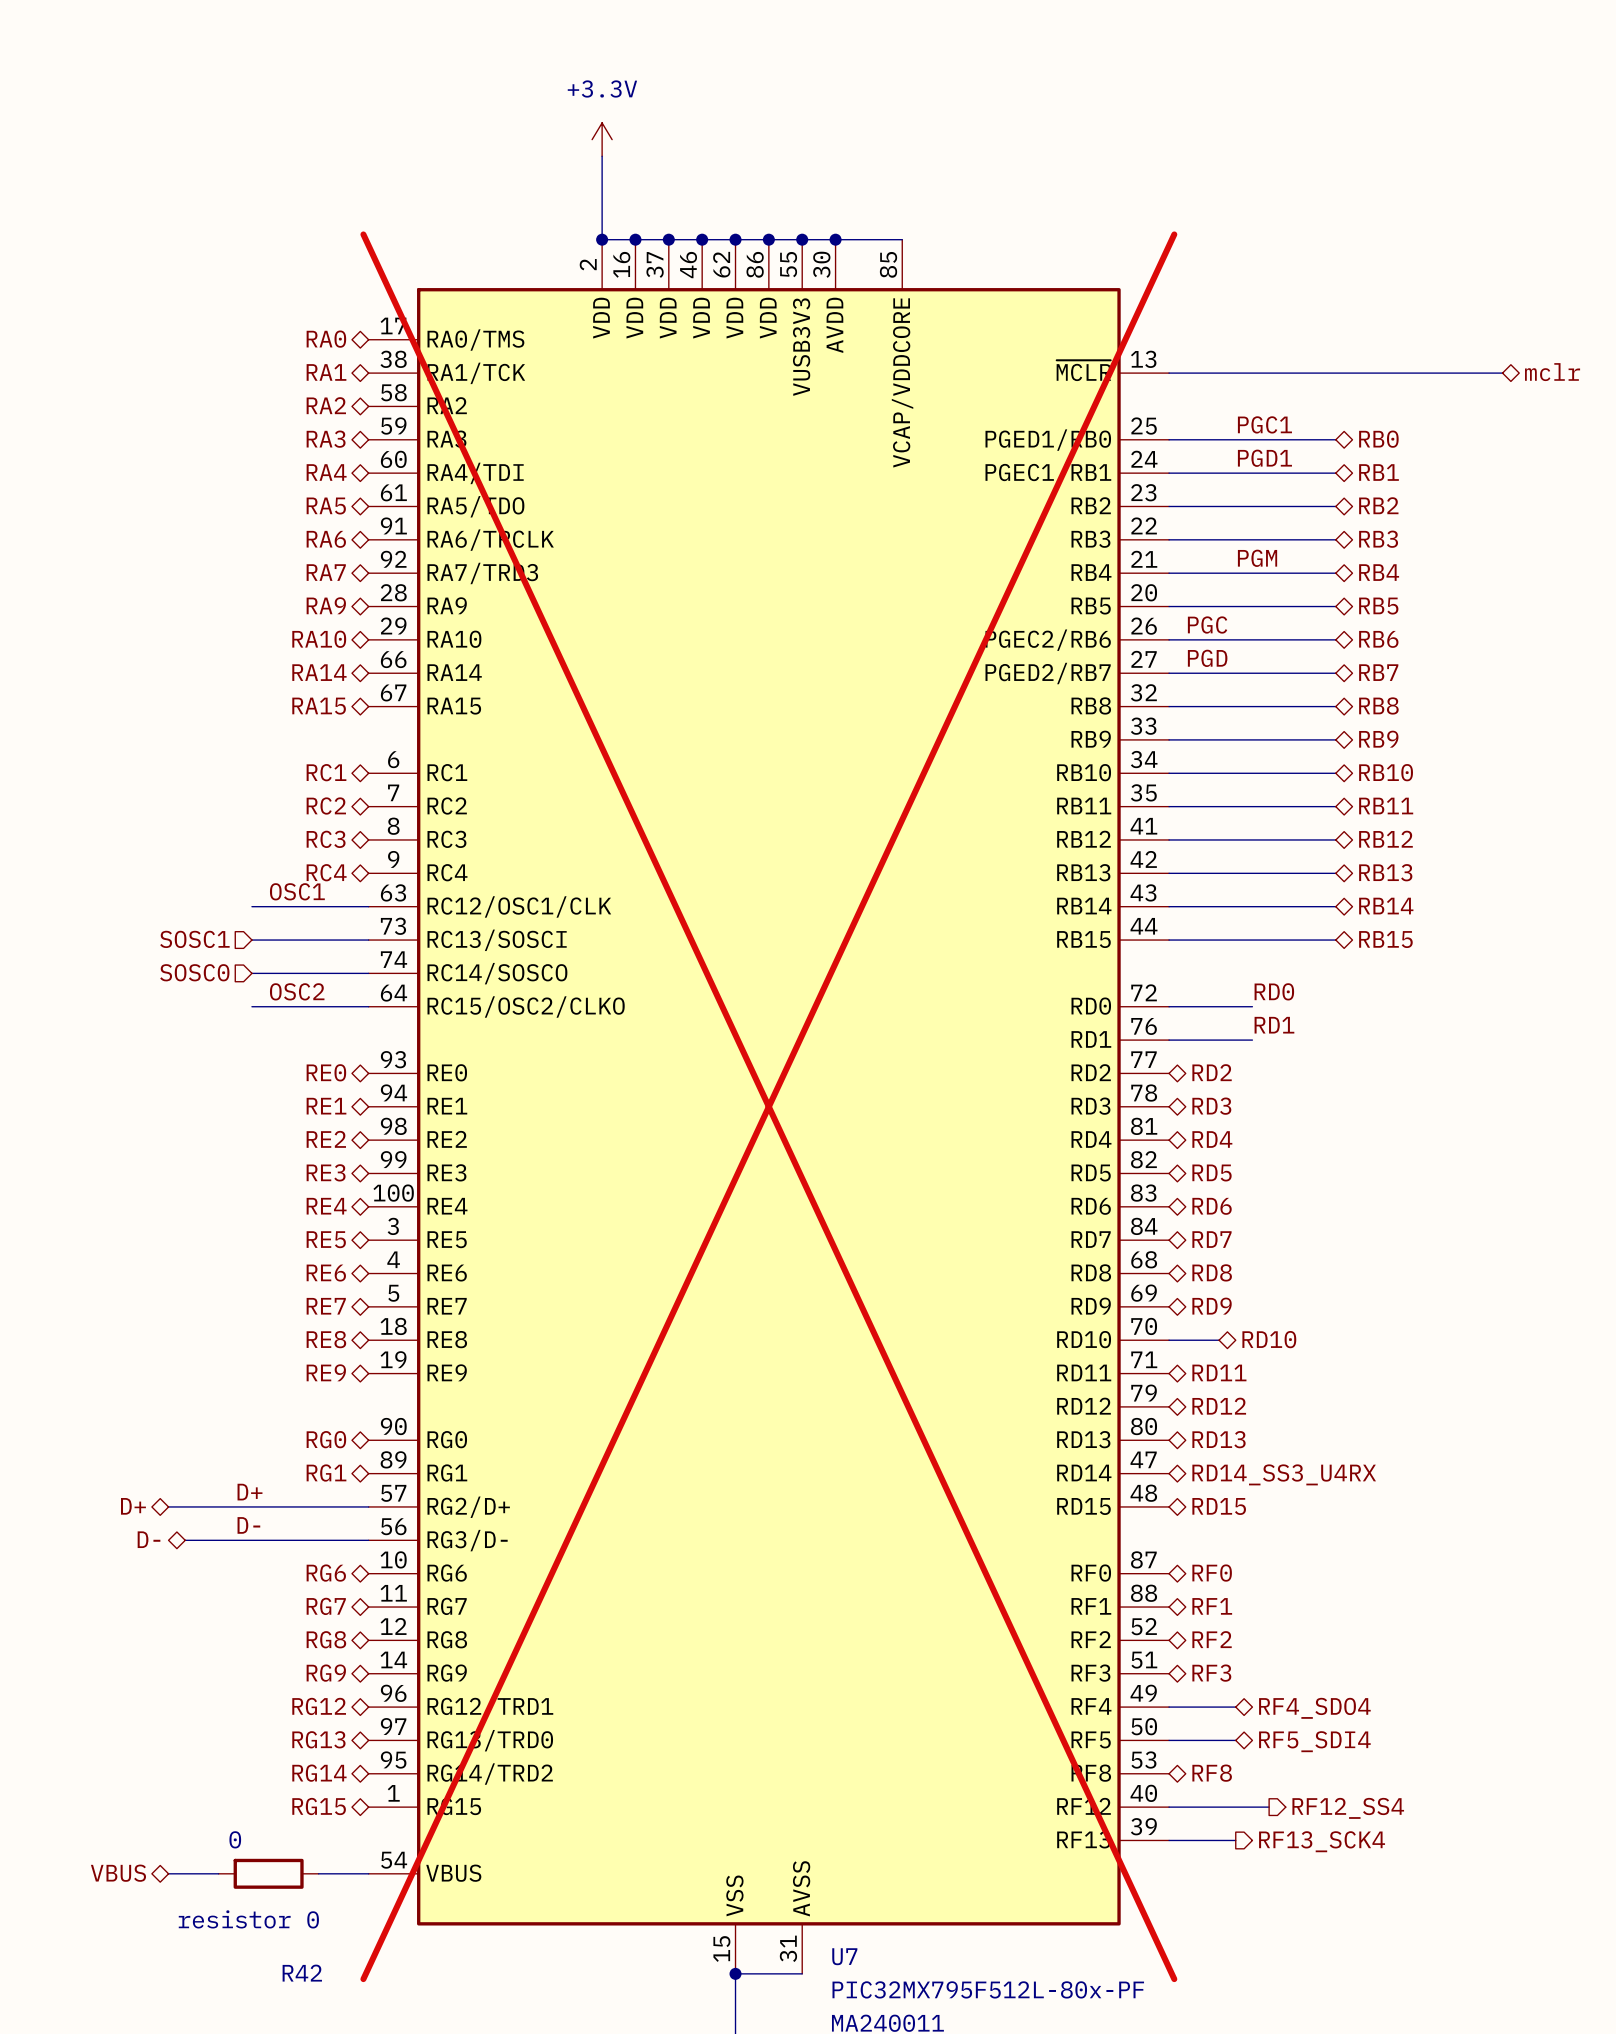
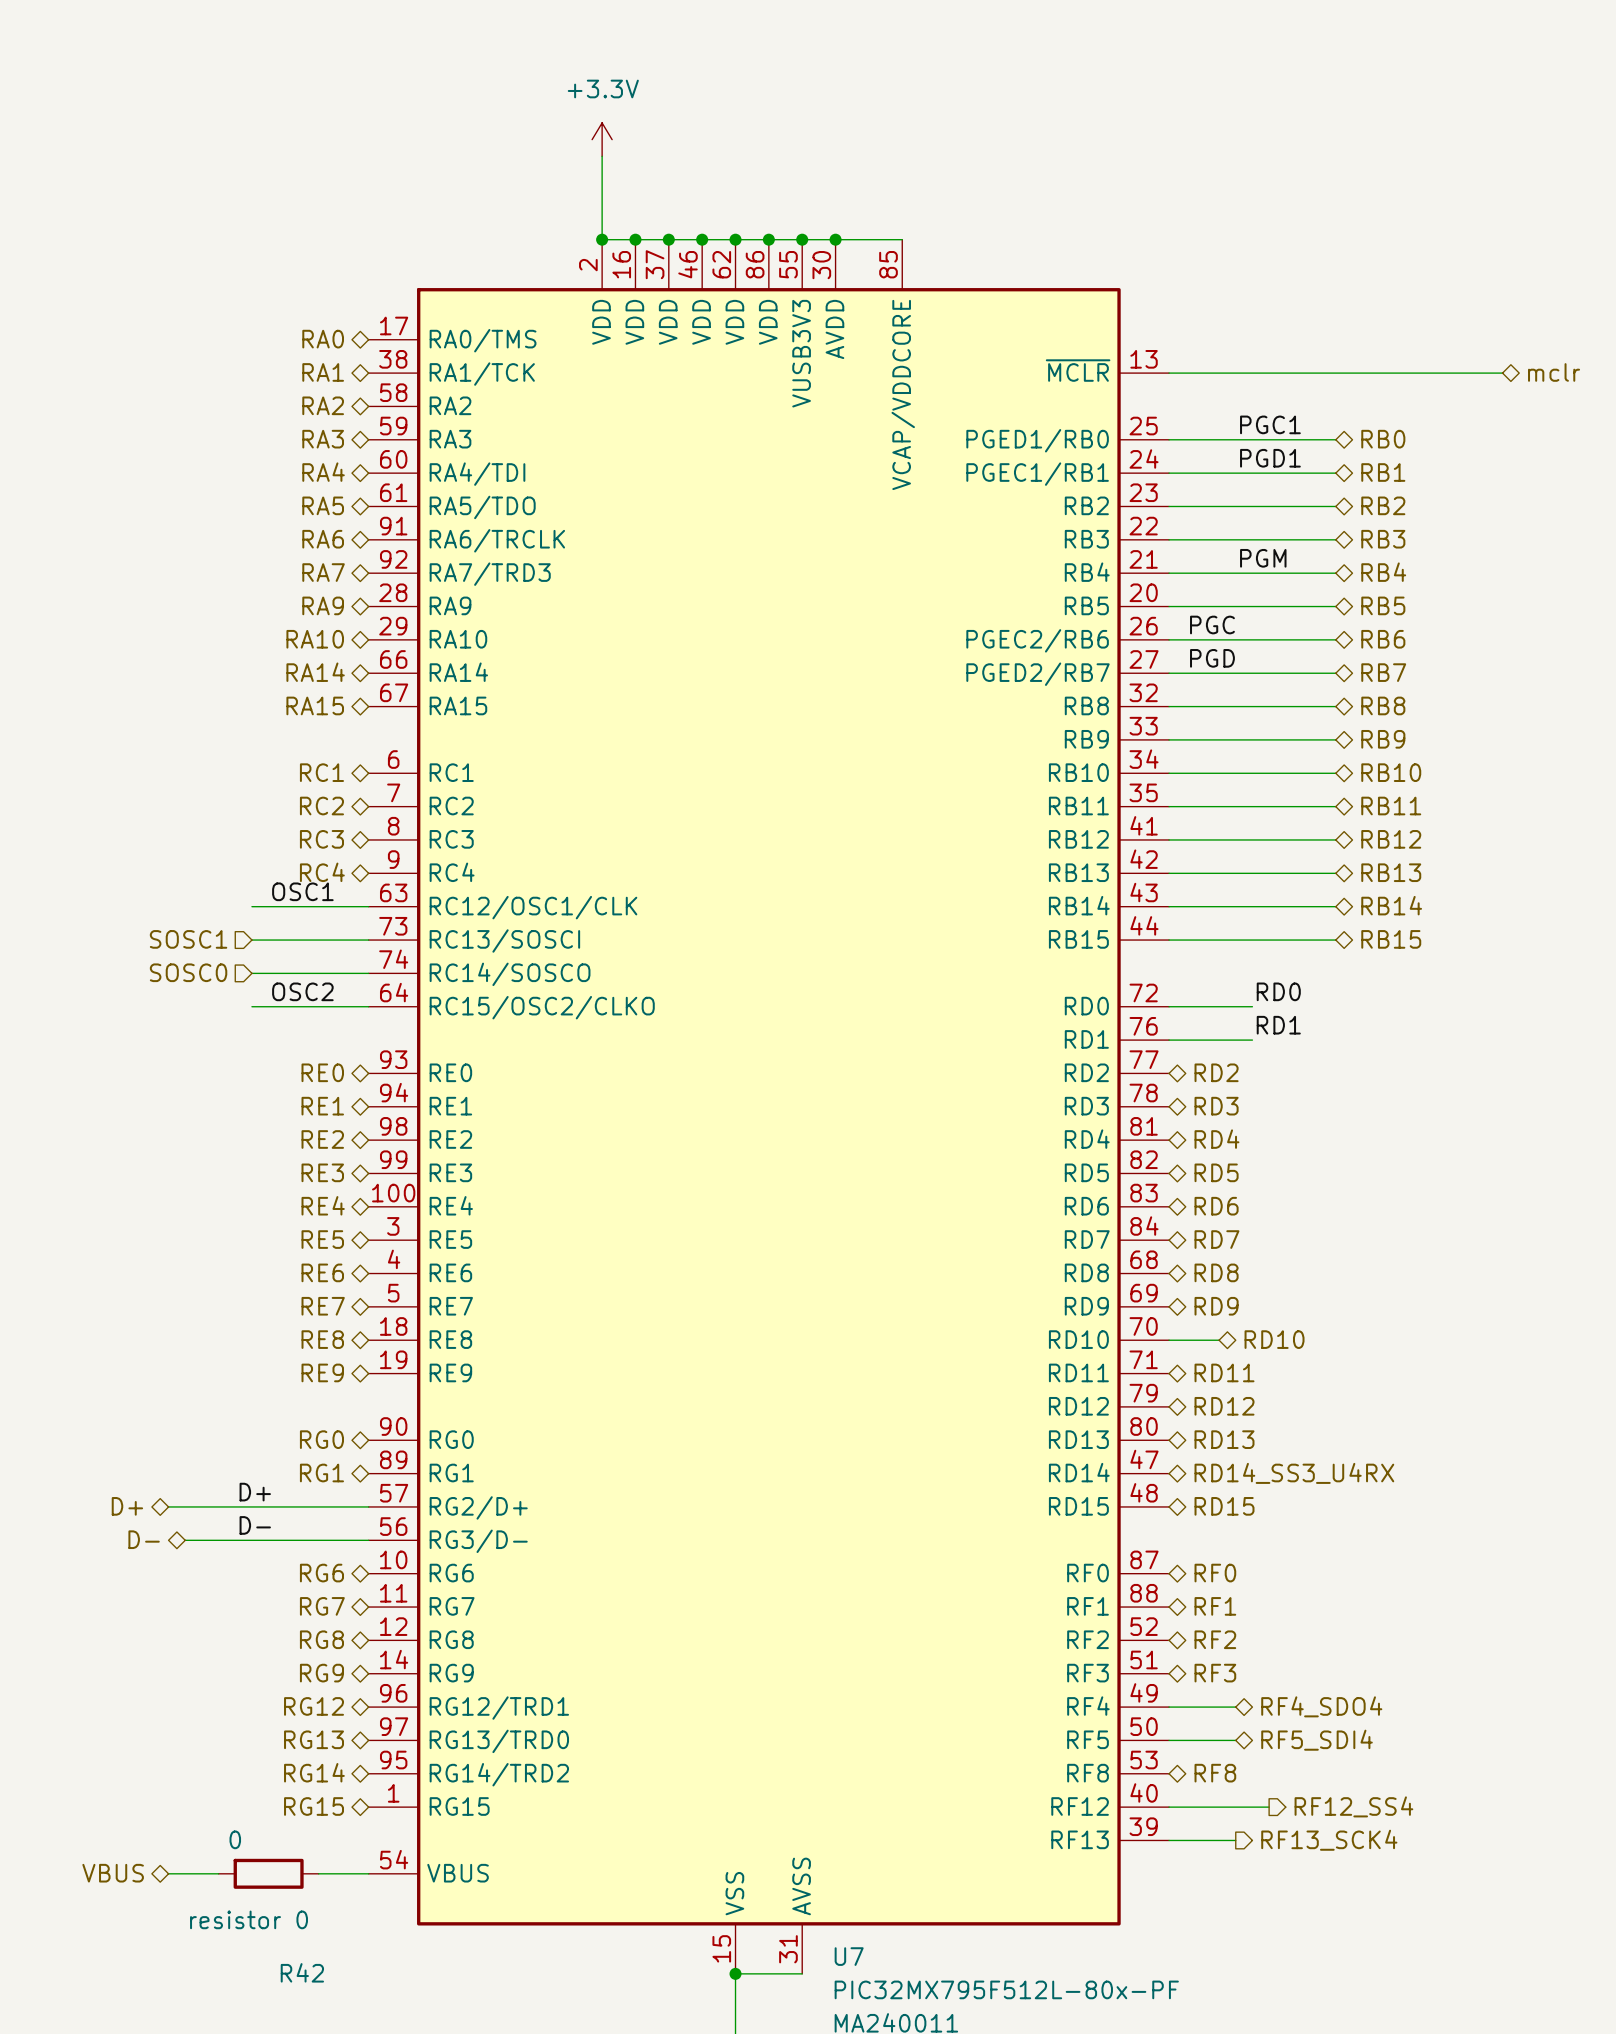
U7 do-not-place cross: (768, 1106) -> none

